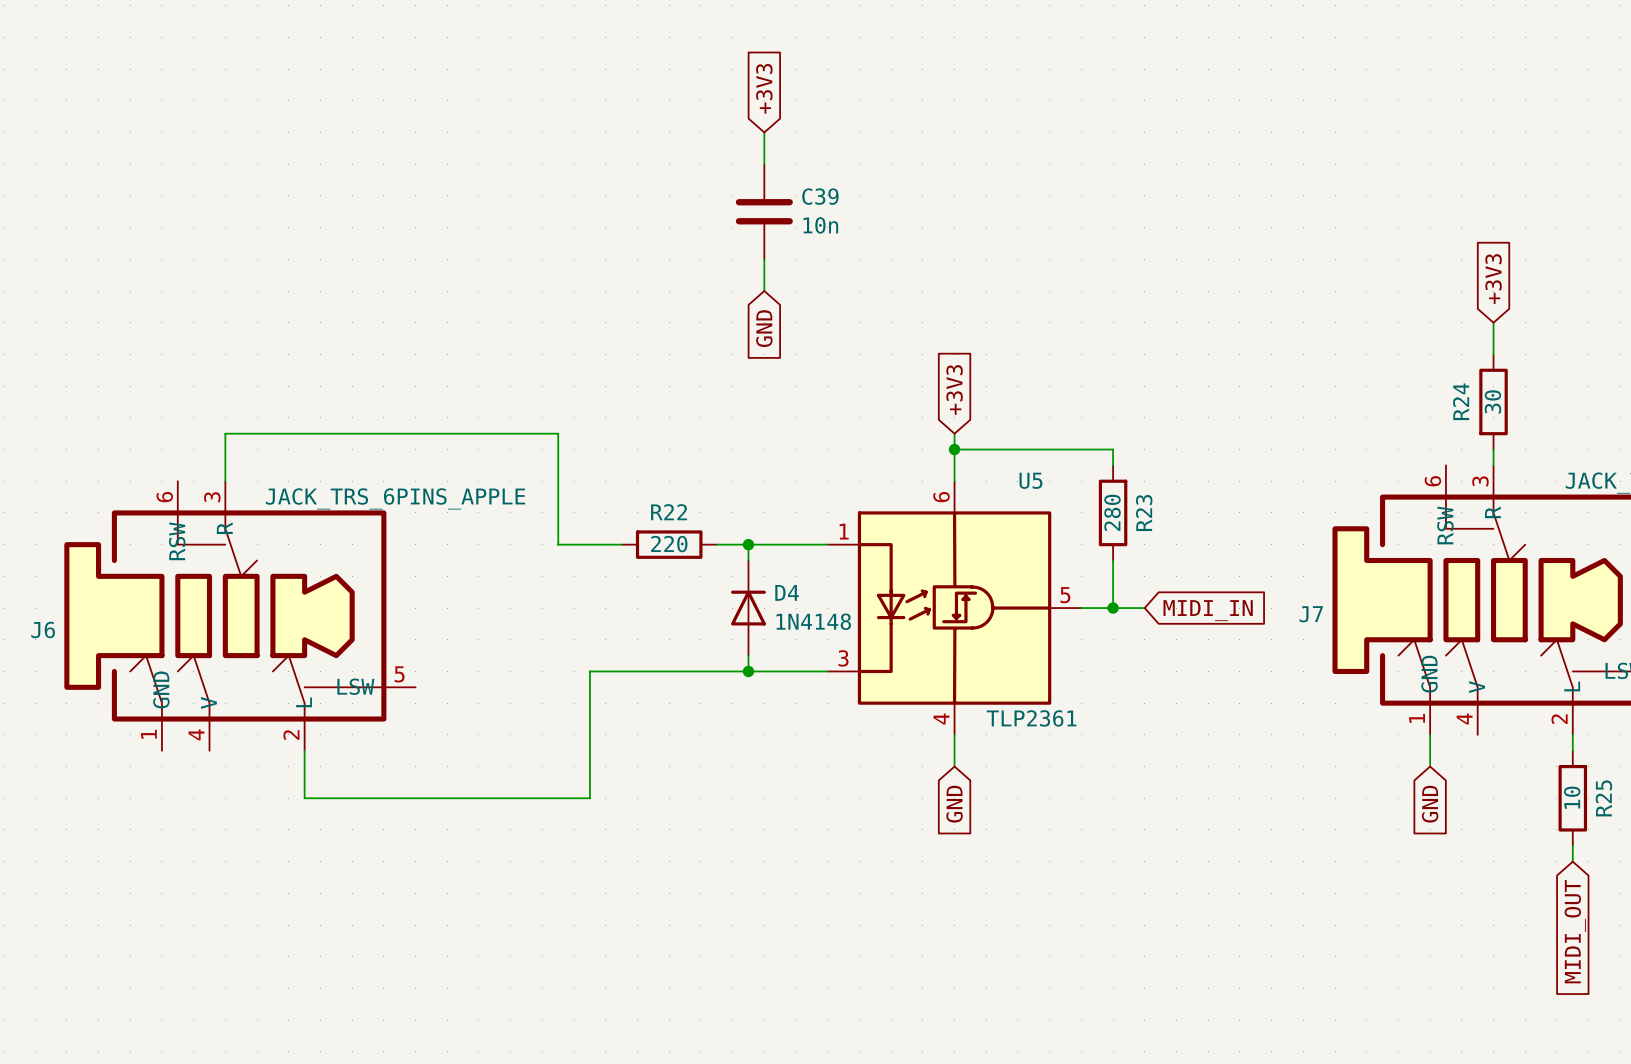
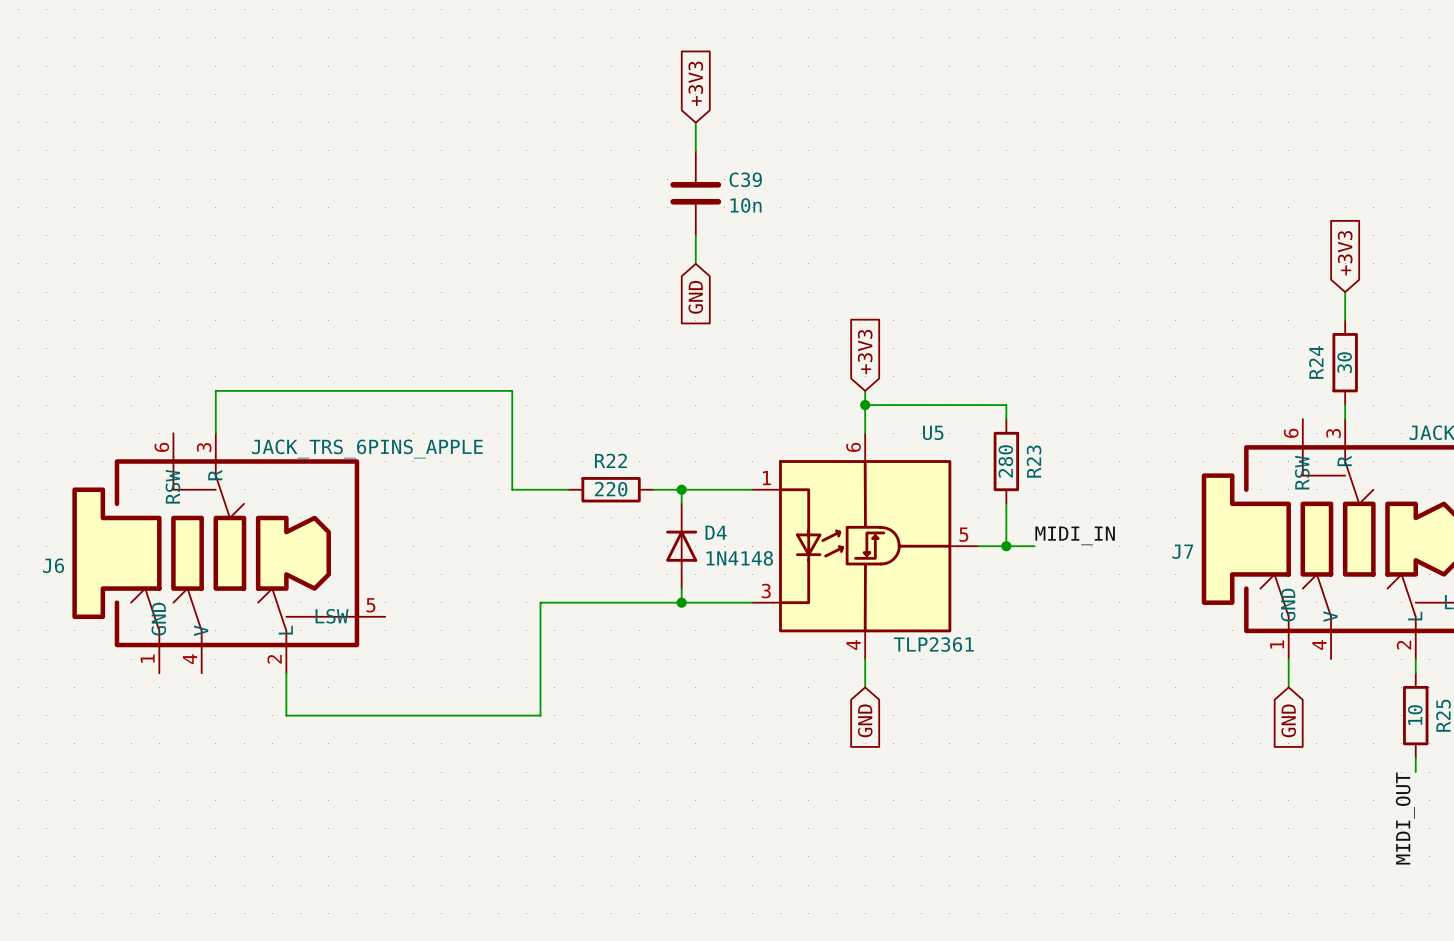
label: none -> MIDI_IN (1075, 535)
global label: MIDI_IN (1208, 610) -> none
label: none -> MIDI_OUT (1405, 818)
global label: MIDI_OUT (1575, 931) -> none

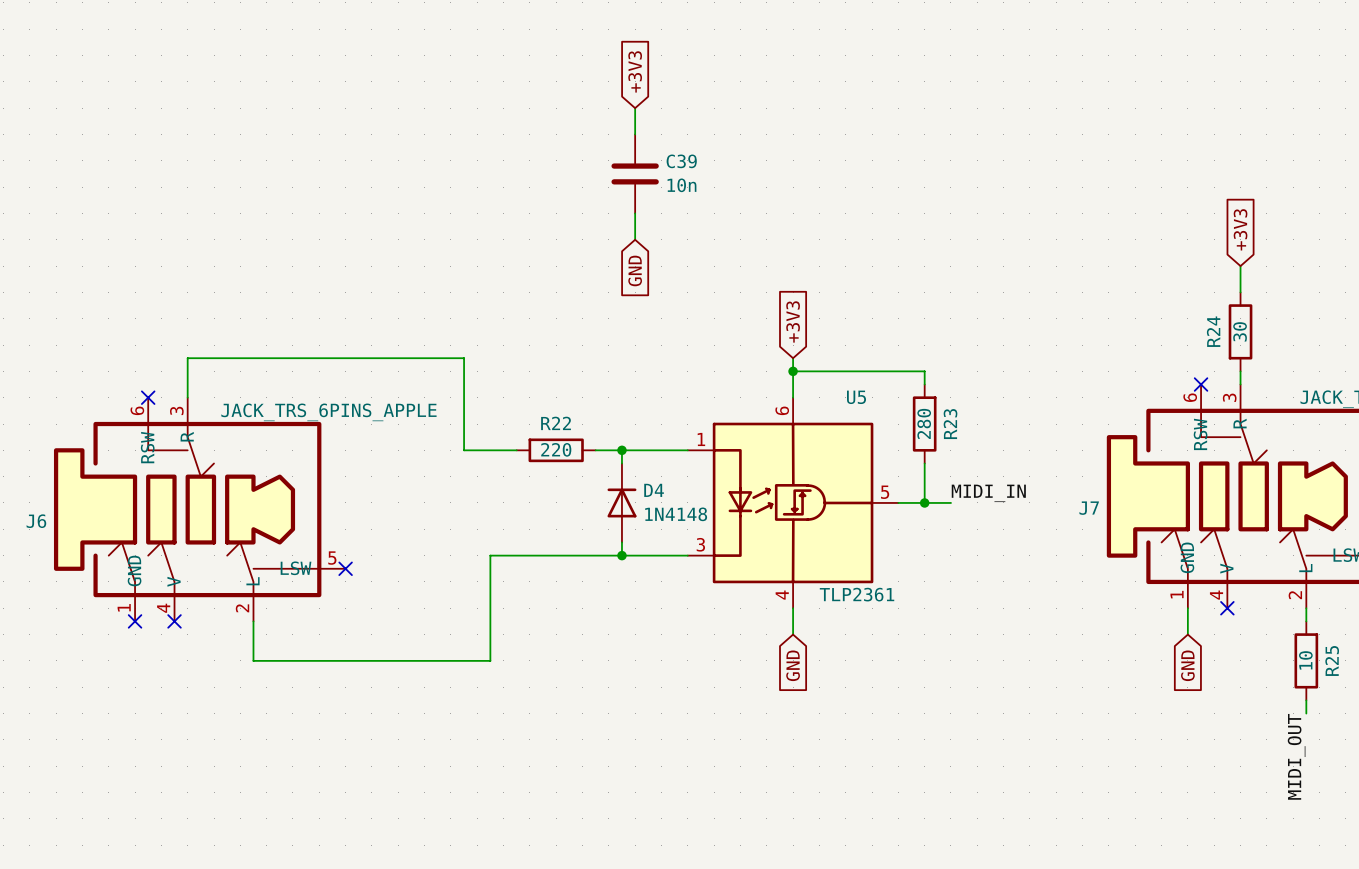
no-connect mark: none -> (1201, 384)
no-connect mark: none -> (148, 397)
no-connect mark: none -> (345, 568)
no-connect mark: none -> (1227, 608)
no-connect mark: none -> (135, 621)
no-connect mark: none -> (174, 621)

